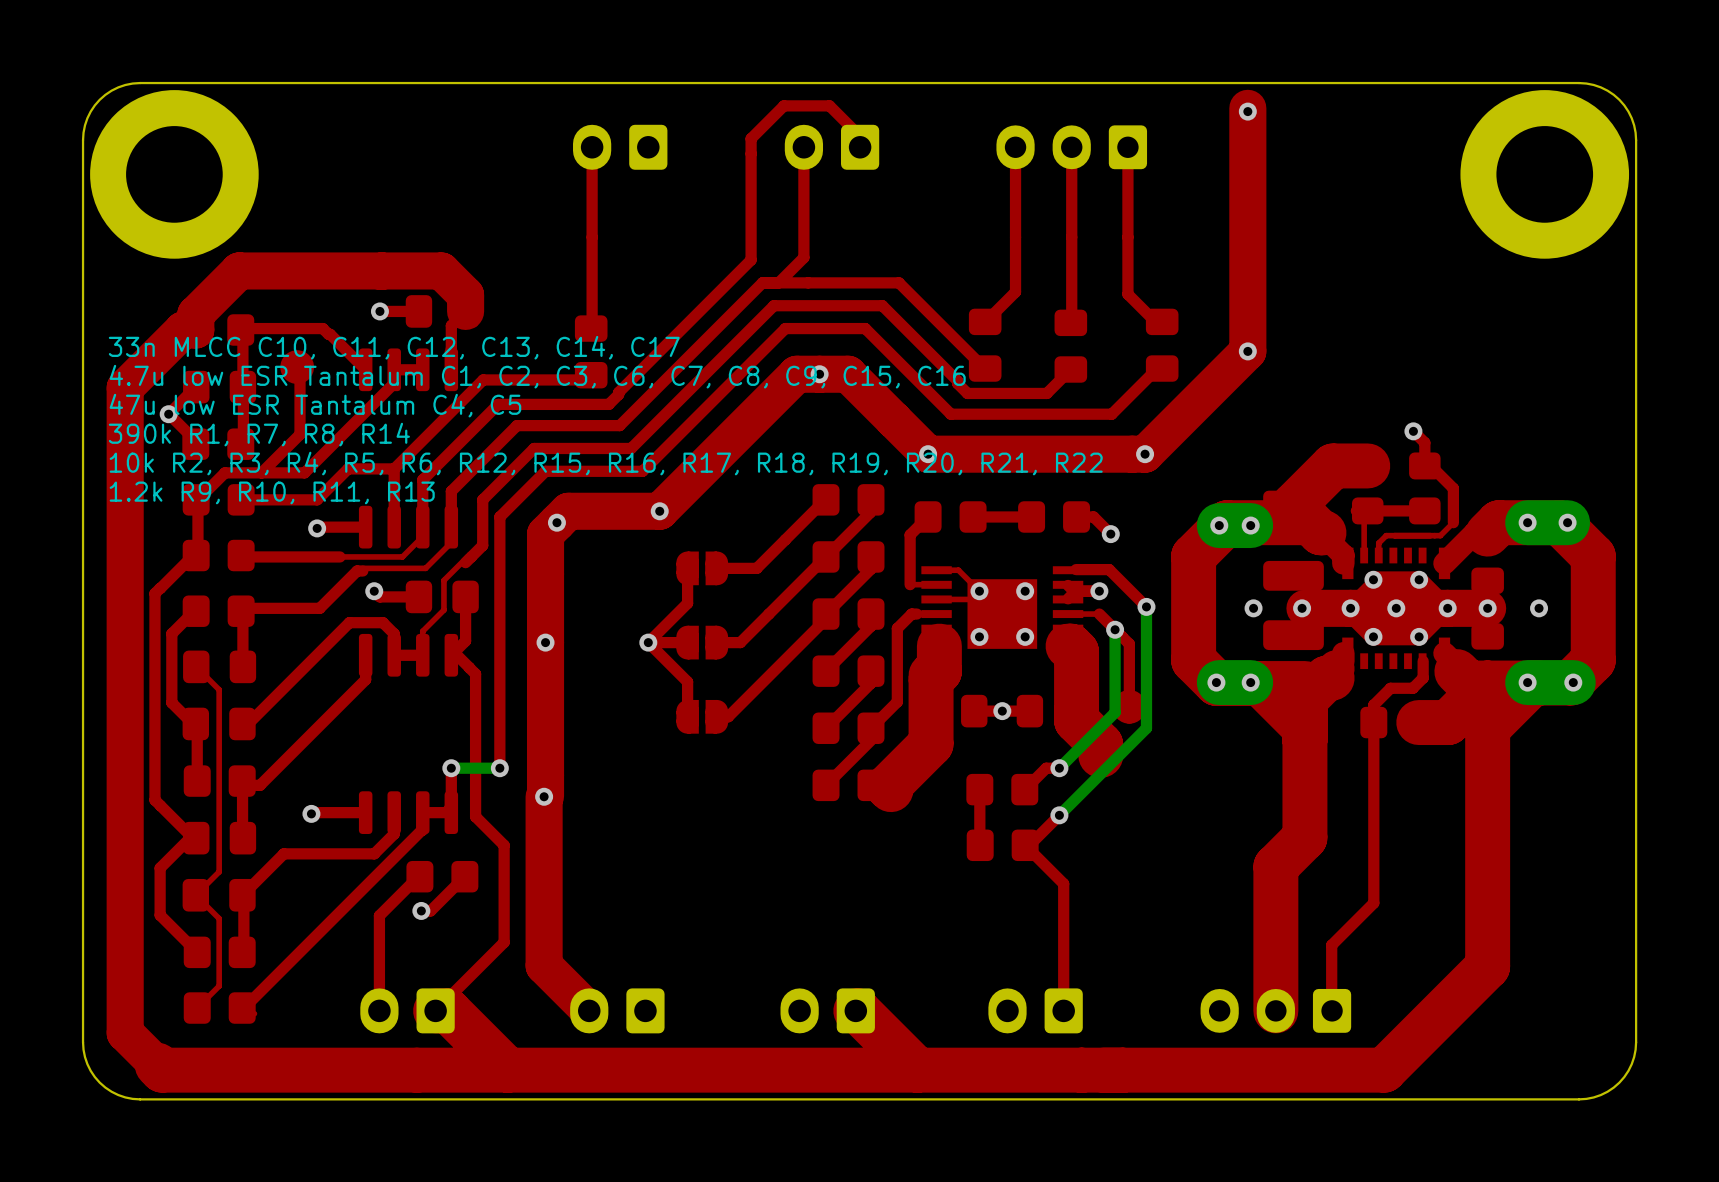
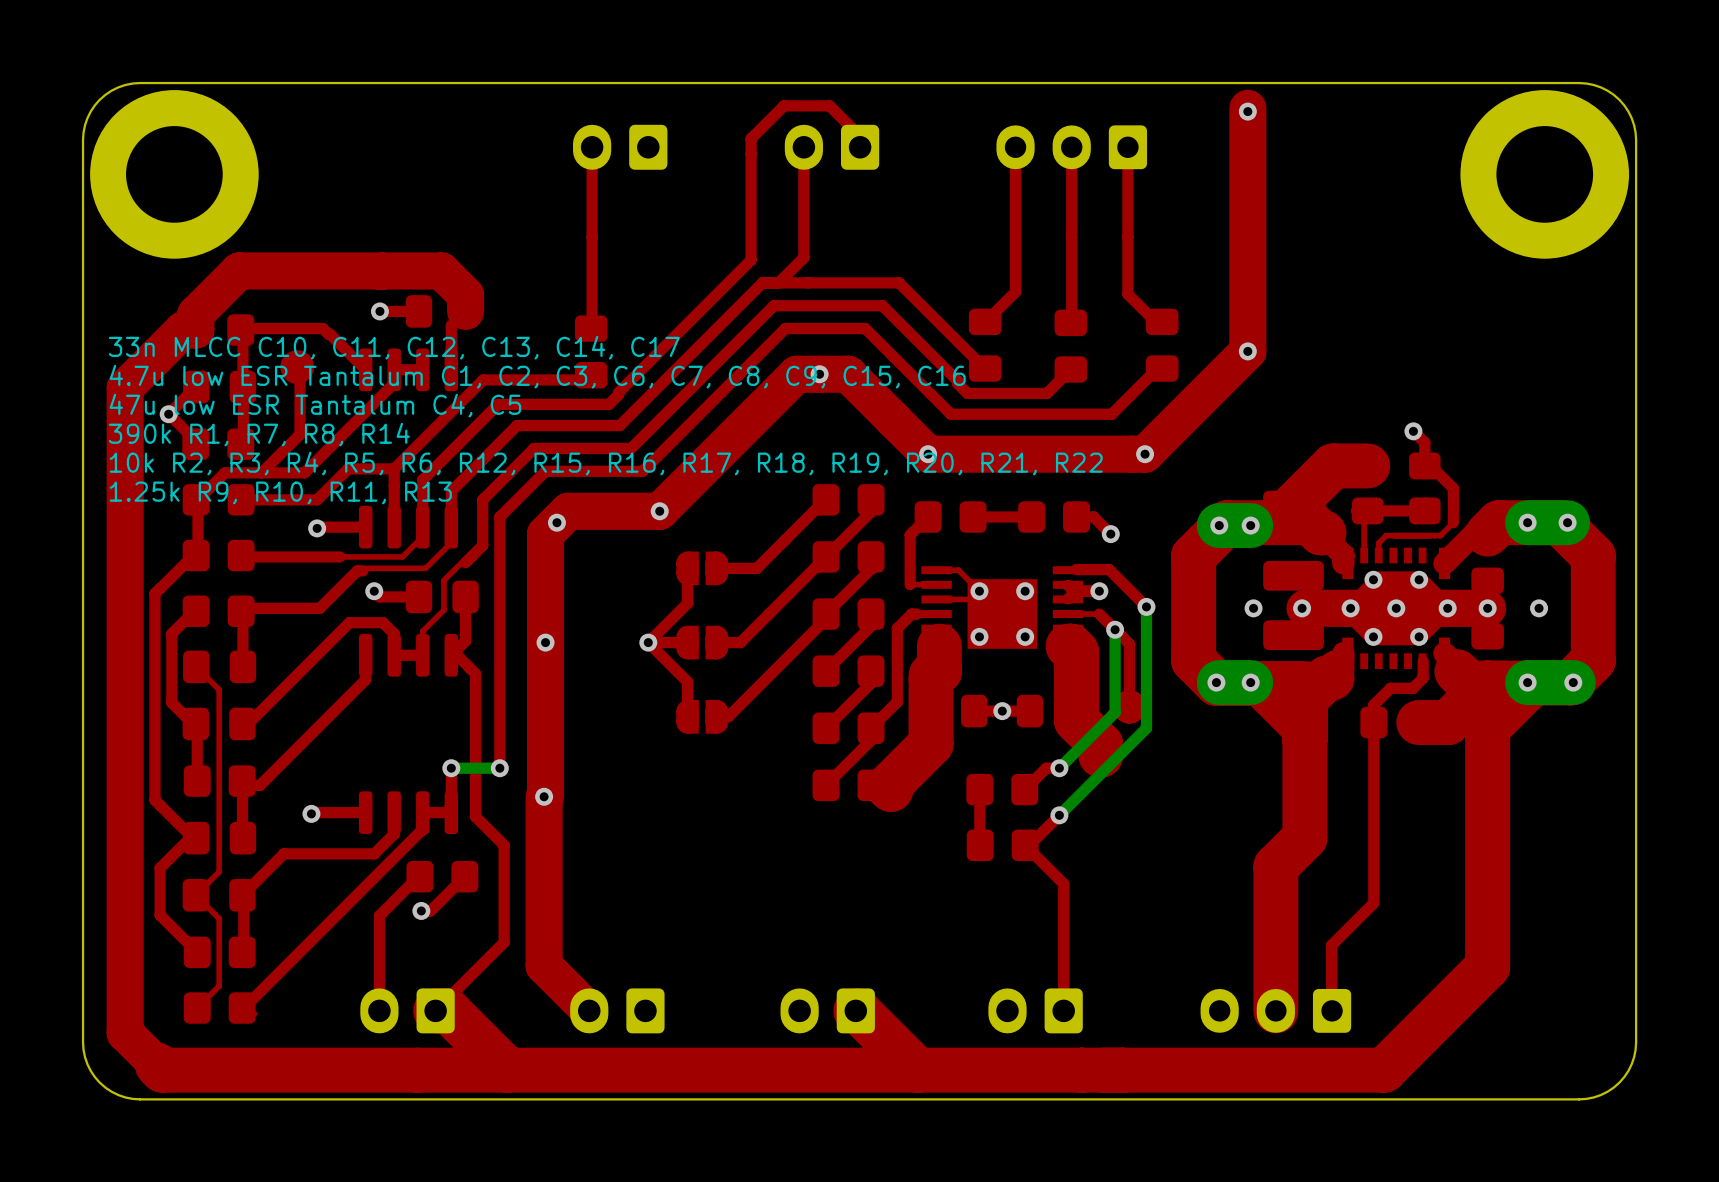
text: 1.2k R9, R10, R11, R13 (272, 492) -> 1.25k R9, R10, R11, R13 (280, 492)

